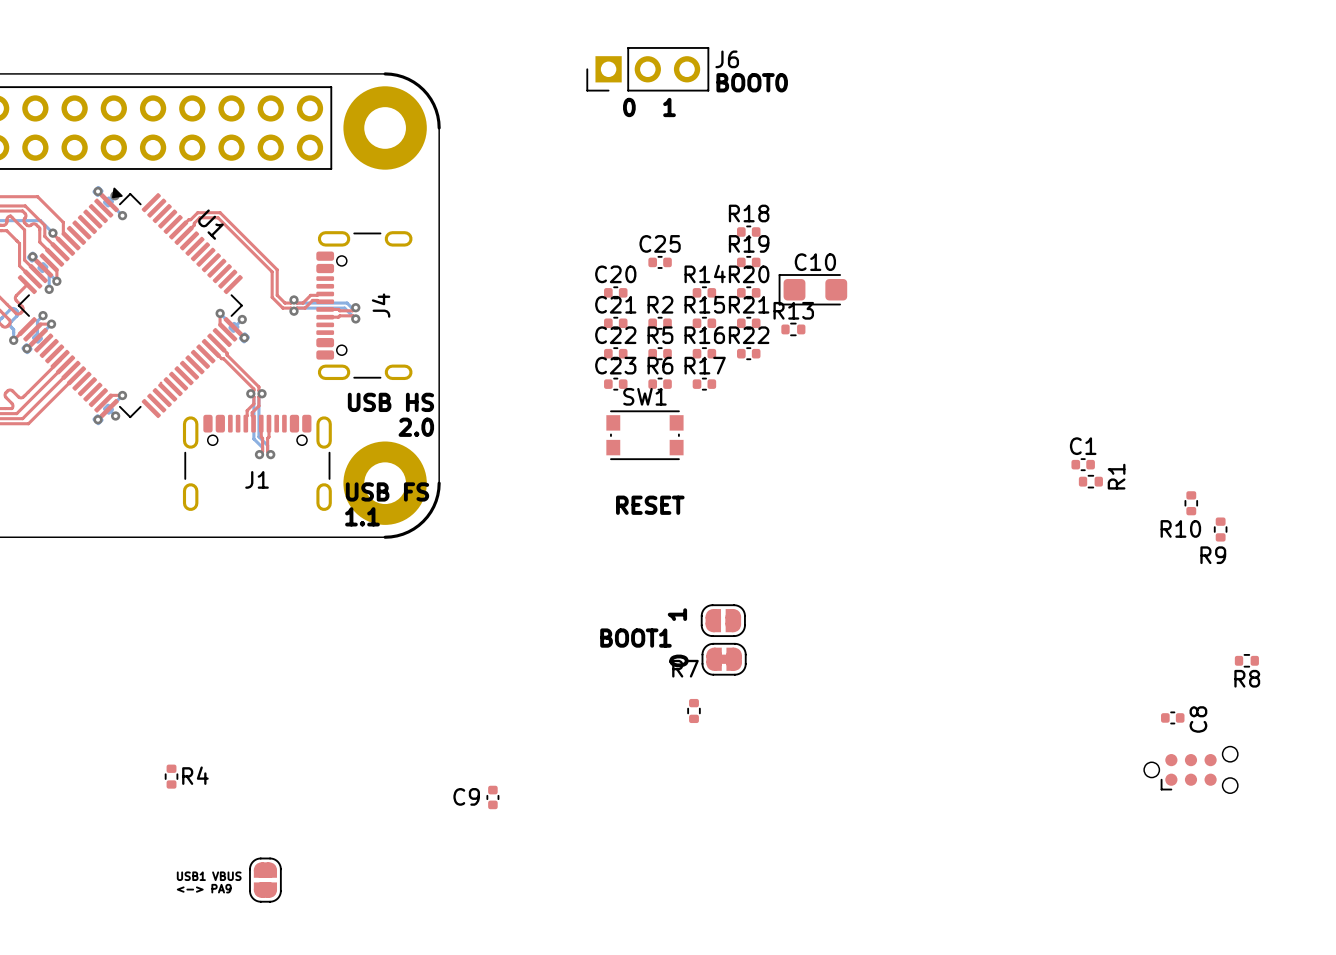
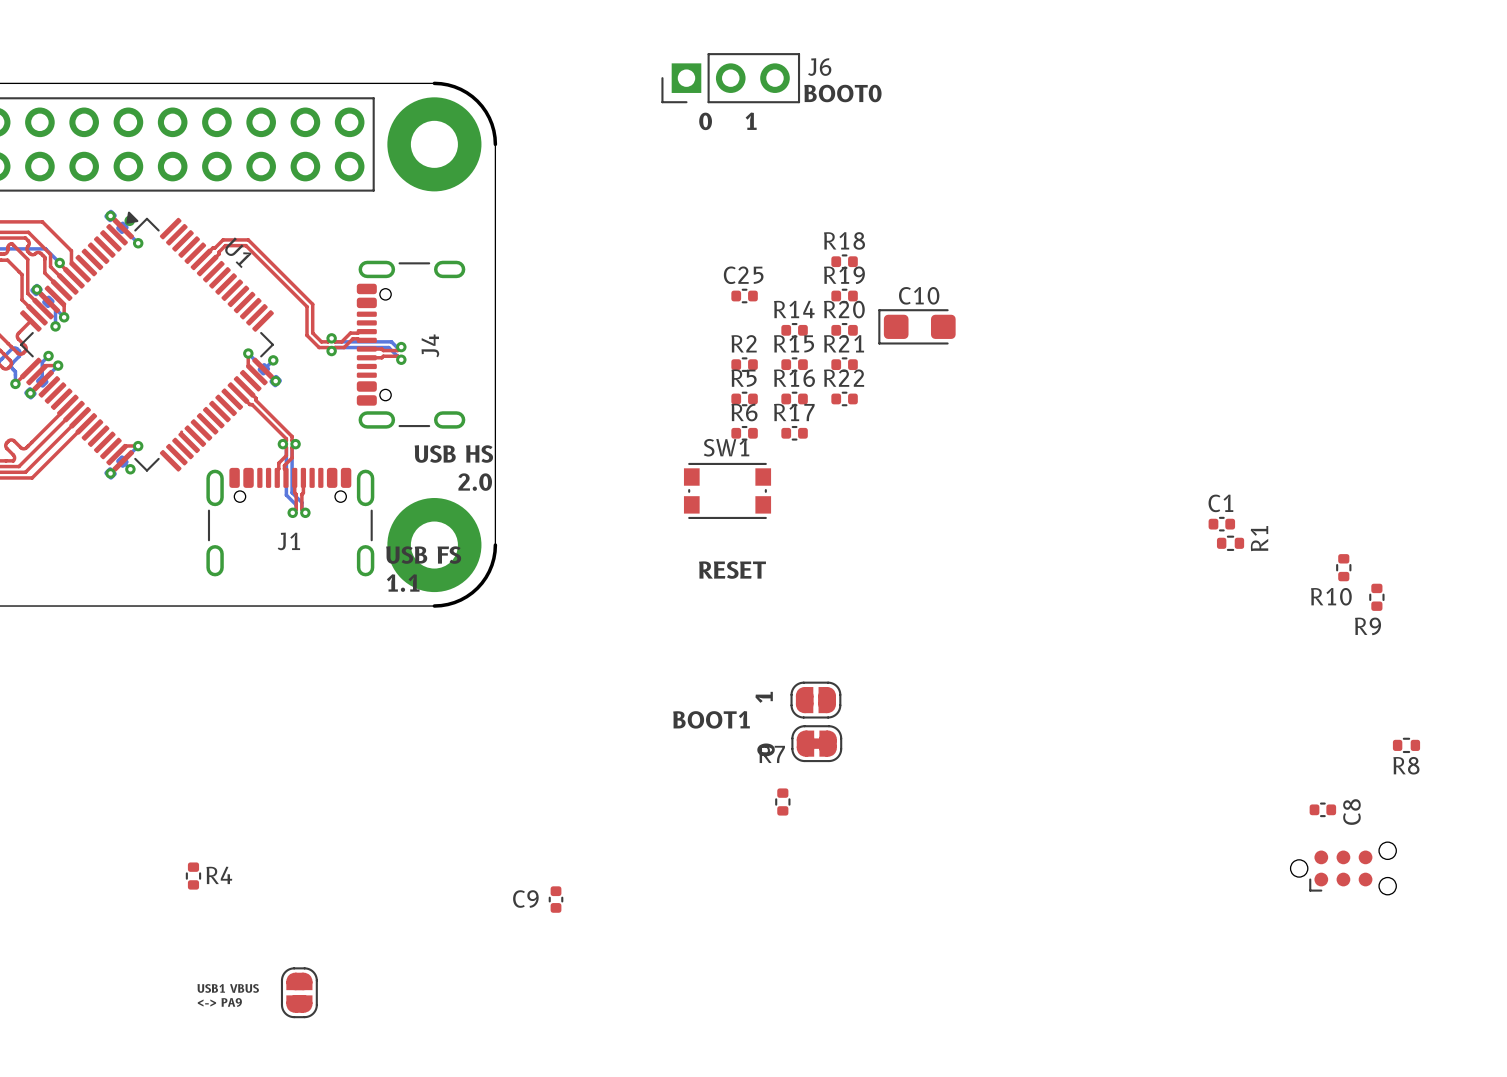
C20: (615, 292) -> none
C21: (615, 323) -> none
R13: (793, 329) -> none
C22: (615, 353) -> none
C23: (615, 384) -> none

